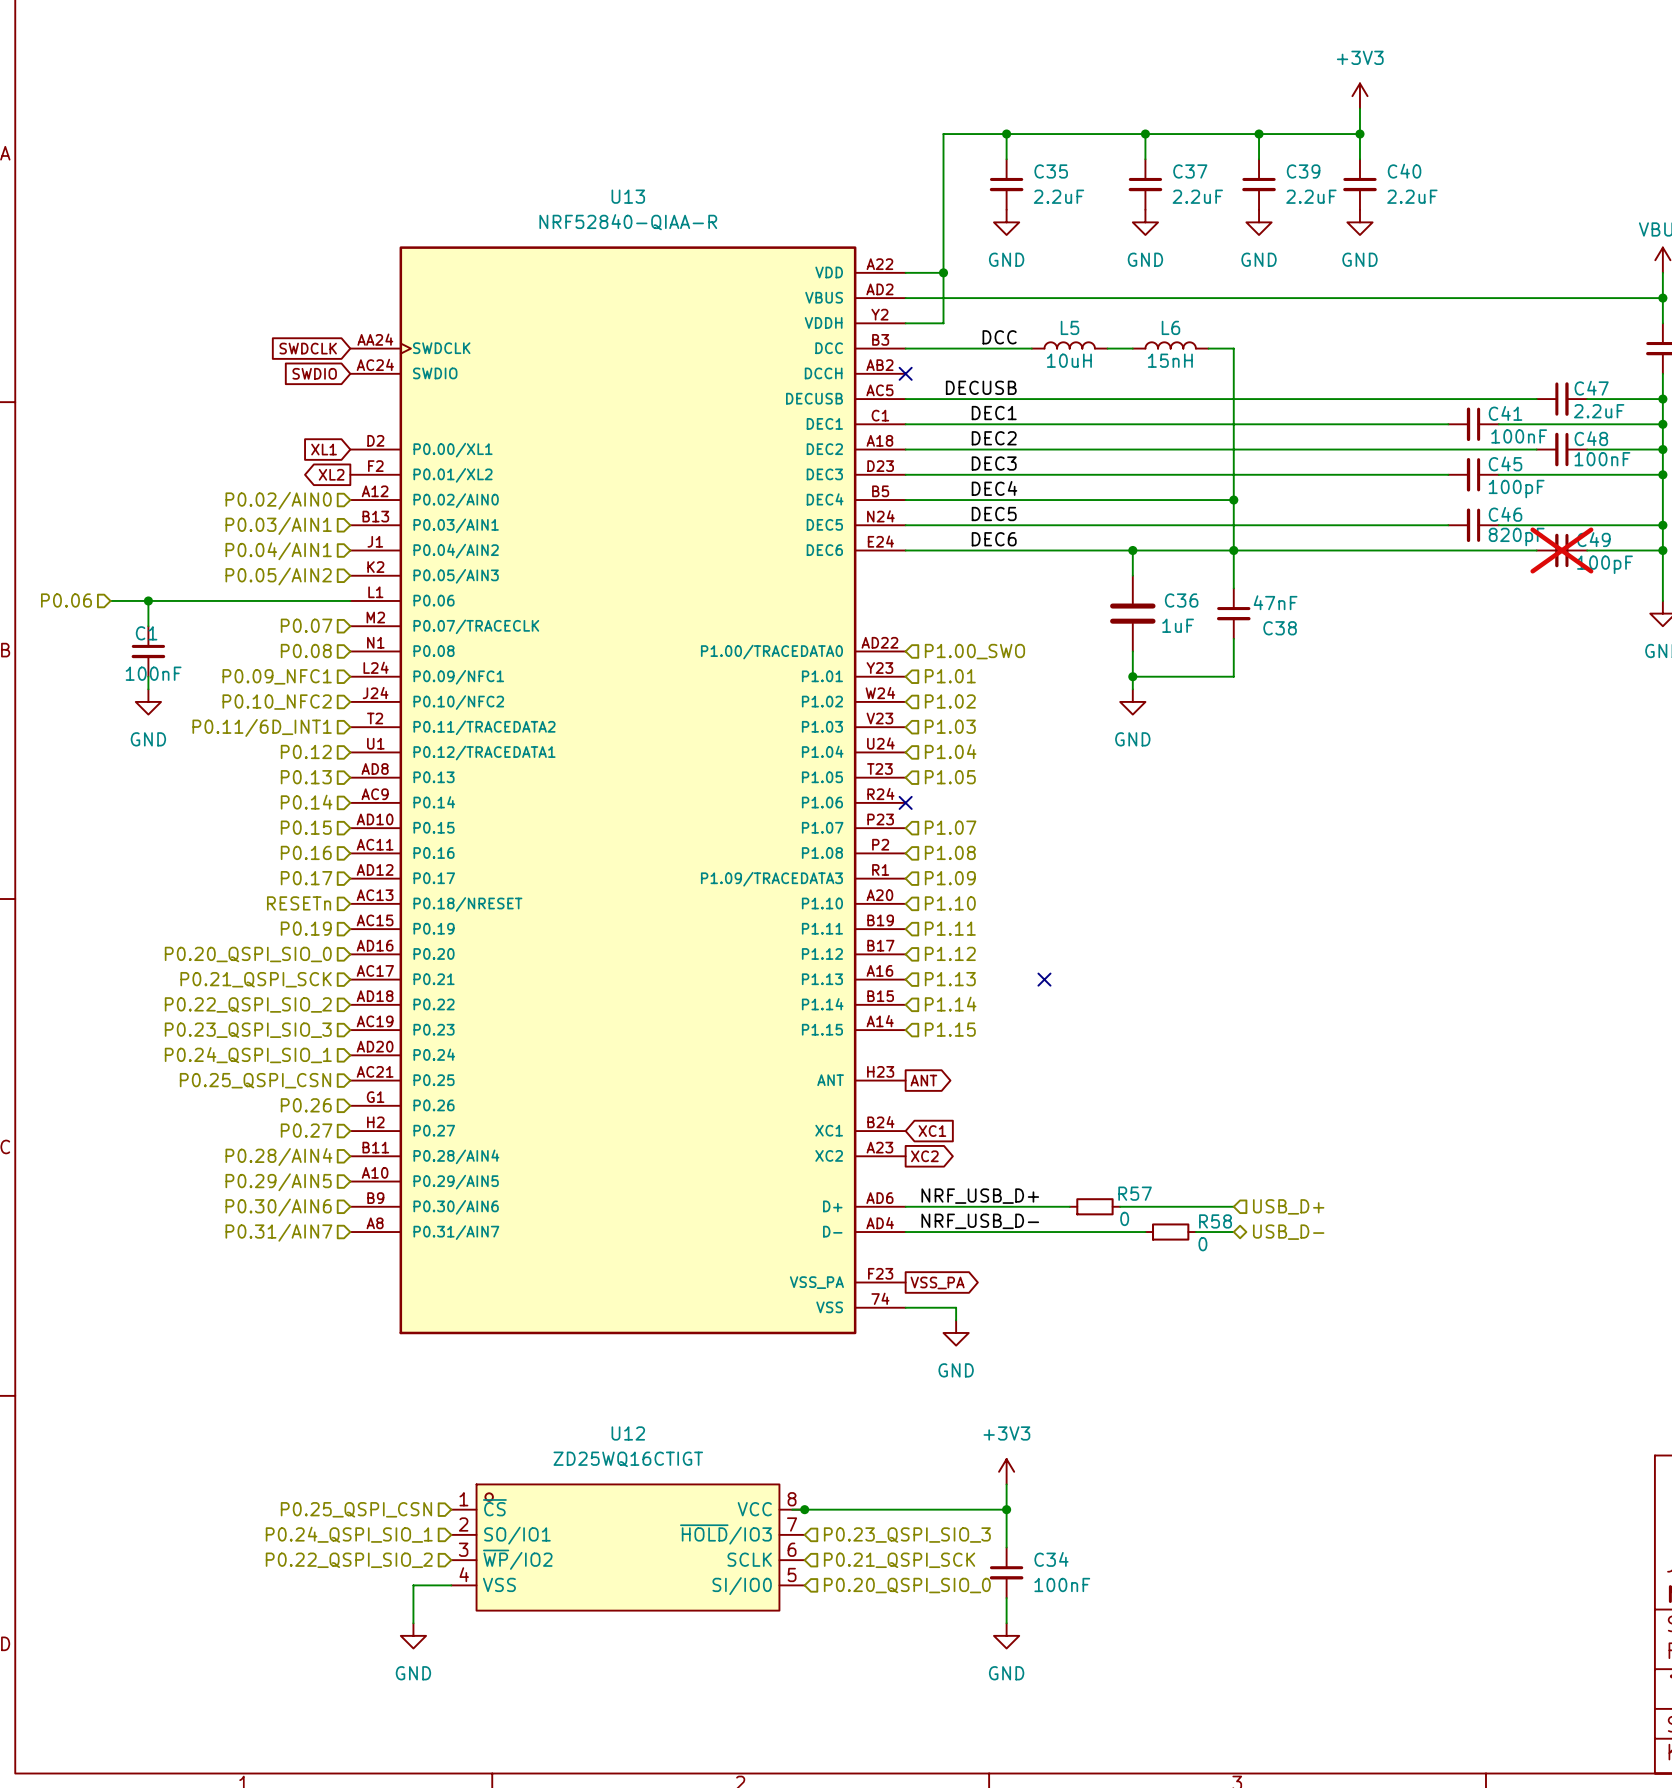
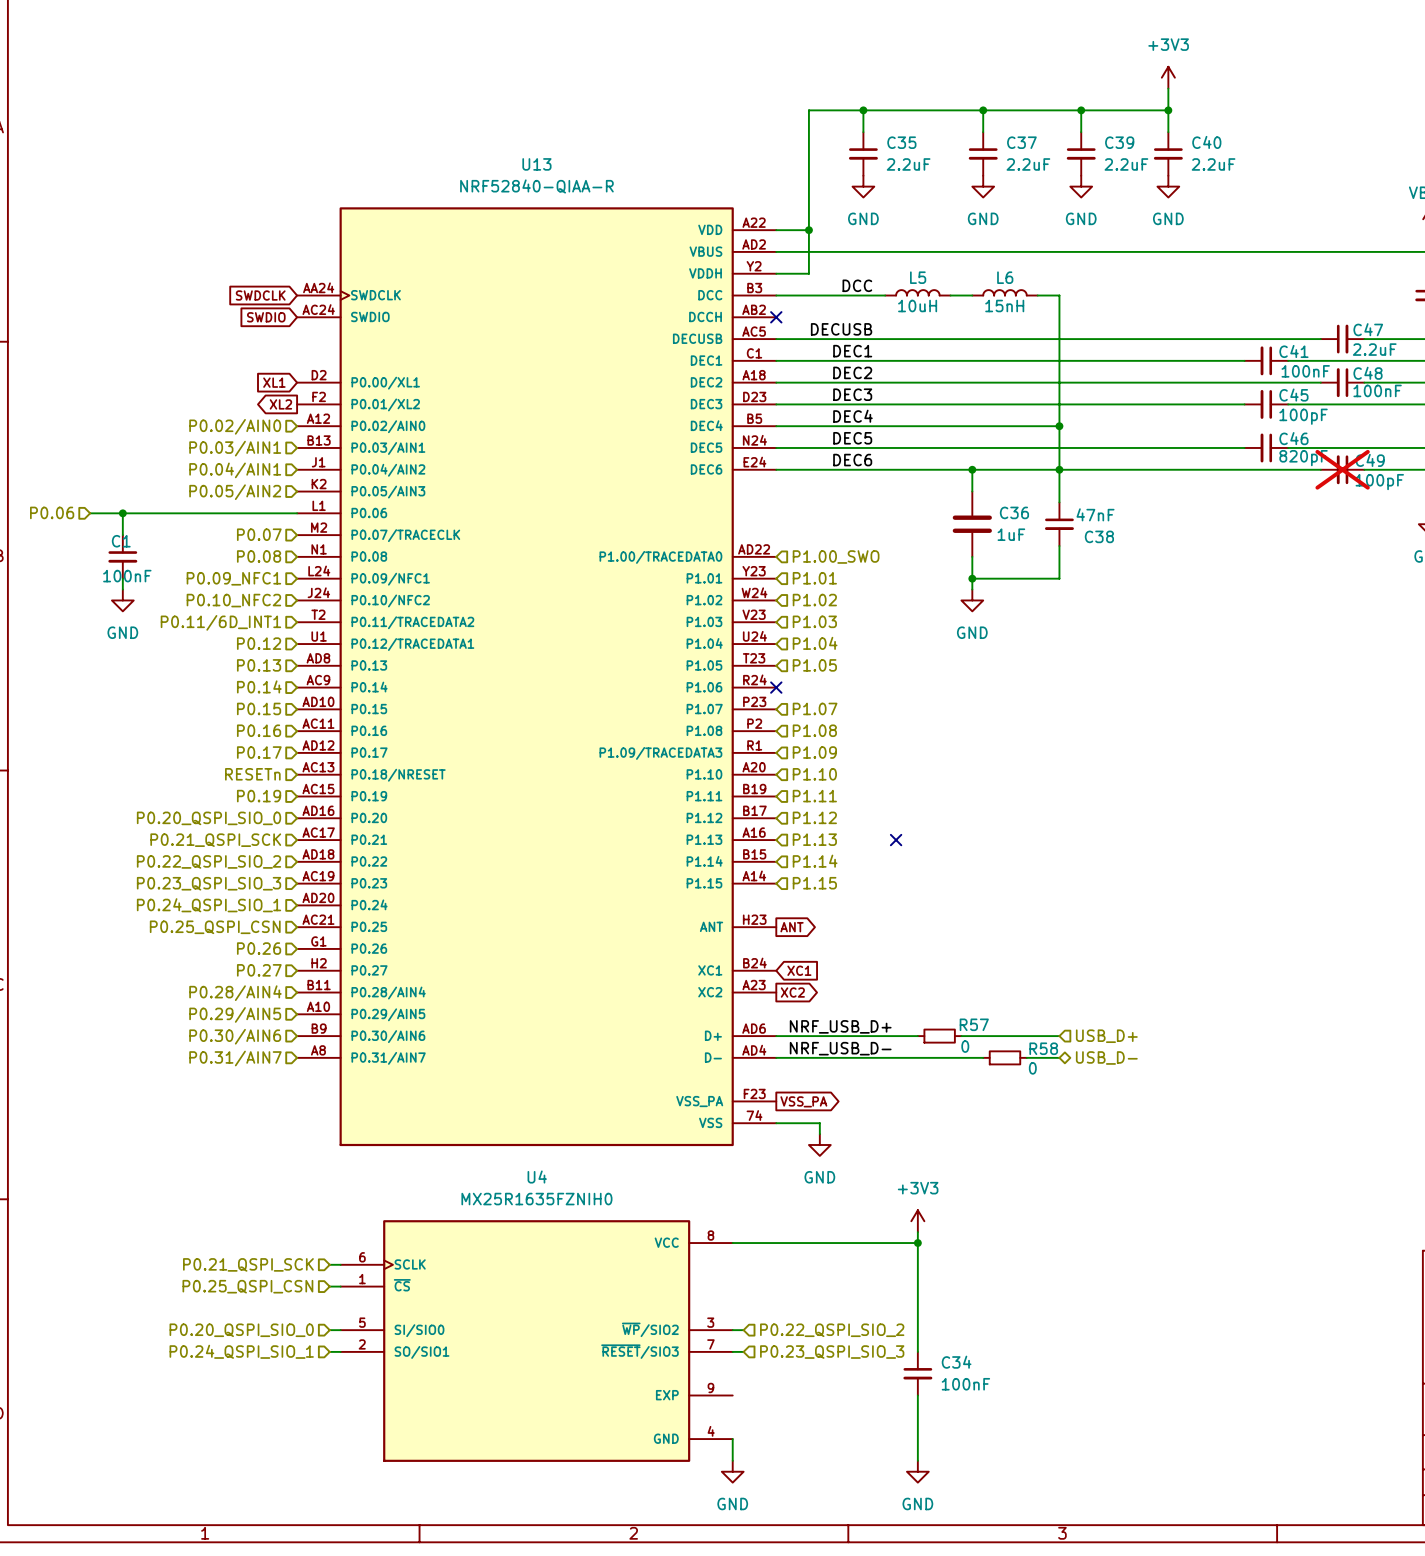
wire: none -> (917, 1232) (917, 1351)
junction: none -> (917, 1243)
hierarchical label: none -> P0.21_QSPI_SCK (248, 1264)
wire: none -> (329, 1264) (340, 1264)
power symbol position: +3V3 (1006, 1471) -> +3V3 (917, 1221)
wire: (1006, 1484) (1006, 1547) -> none
wire: none -> (329, 1286) (340, 1286)
hierarchical label position: P0.25_QSPI_CSN (356, 1509) -> P0.25_QSPI_CSN (247, 1286)
wire: (792, 1509) (1006, 1509) -> (732, 1243) (917, 1243)
junction: (804, 1509) -> none
junction: (1006, 1509) -> none
hierarchical label position: P0.24_QSPI_SIO_1 (349, 1534) -> P0.24_QSPI_SIO_1 (241, 1351)
hierarchical label position: P0.23_QSPI_SIO_3 (907, 1535) -> P0.23_QSPI_SIO_3 (832, 1352)
wire: none -> (329, 1330) (340, 1330)
U12: ZD25WQ16CTIGT (627, 1547) -> none
wire: none -> (732, 1330) (743, 1330)
hierarchical label: P0.22_QSPI_SIO_2 (349, 1560) -> P0.20_QSPI_SIO_0 (241, 1330)
U4: none -> MX25R1635FZNIH0 (536, 1341)
hierarchical label: P0.21_QSPI_SCK (899, 1560) -> P0.22_QSPI_SIO_2 (832, 1330)
wire: none -> (329, 1351) (340, 1351)
wire: none -> (732, 1351) (743, 1351)
C34 position: (1006, 1572) -> (917, 1373)
wire: (451, 1585) (413, 1585) (413, 1623) -> none
hierarchical label: P0.20_QSPI_SIO_0 (907, 1585) -> none
wire: (1006, 1598) (1006, 1623) -> (732, 1439) (732, 1460)
wire: none -> (917, 1395) (917, 1460)
power symbol: GND (413, 1635) -> none
power symbol: GND (1006, 1635) -> none
power symbol: none -> GND (732, 1471)
power symbol: none -> GND (917, 1471)

